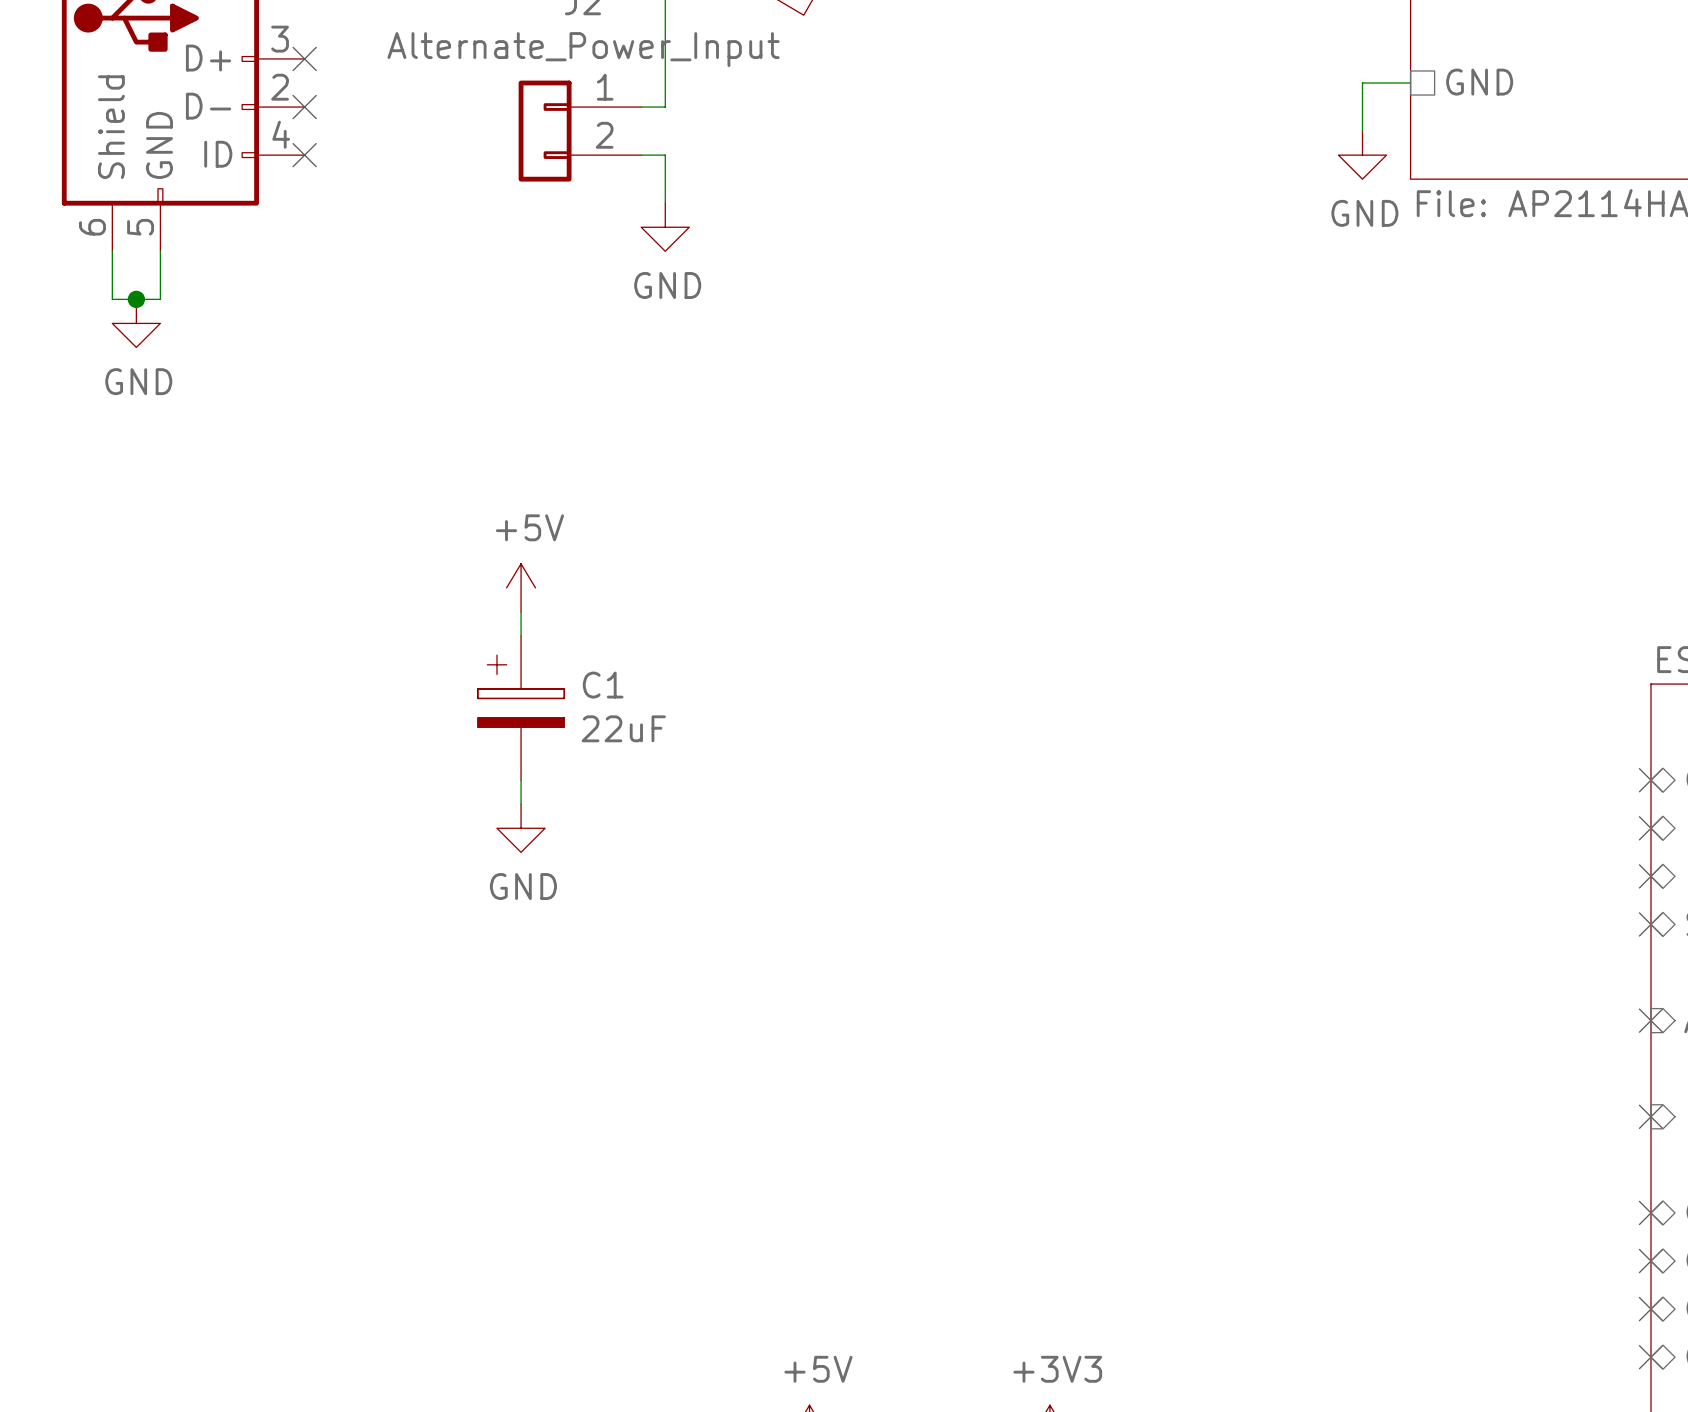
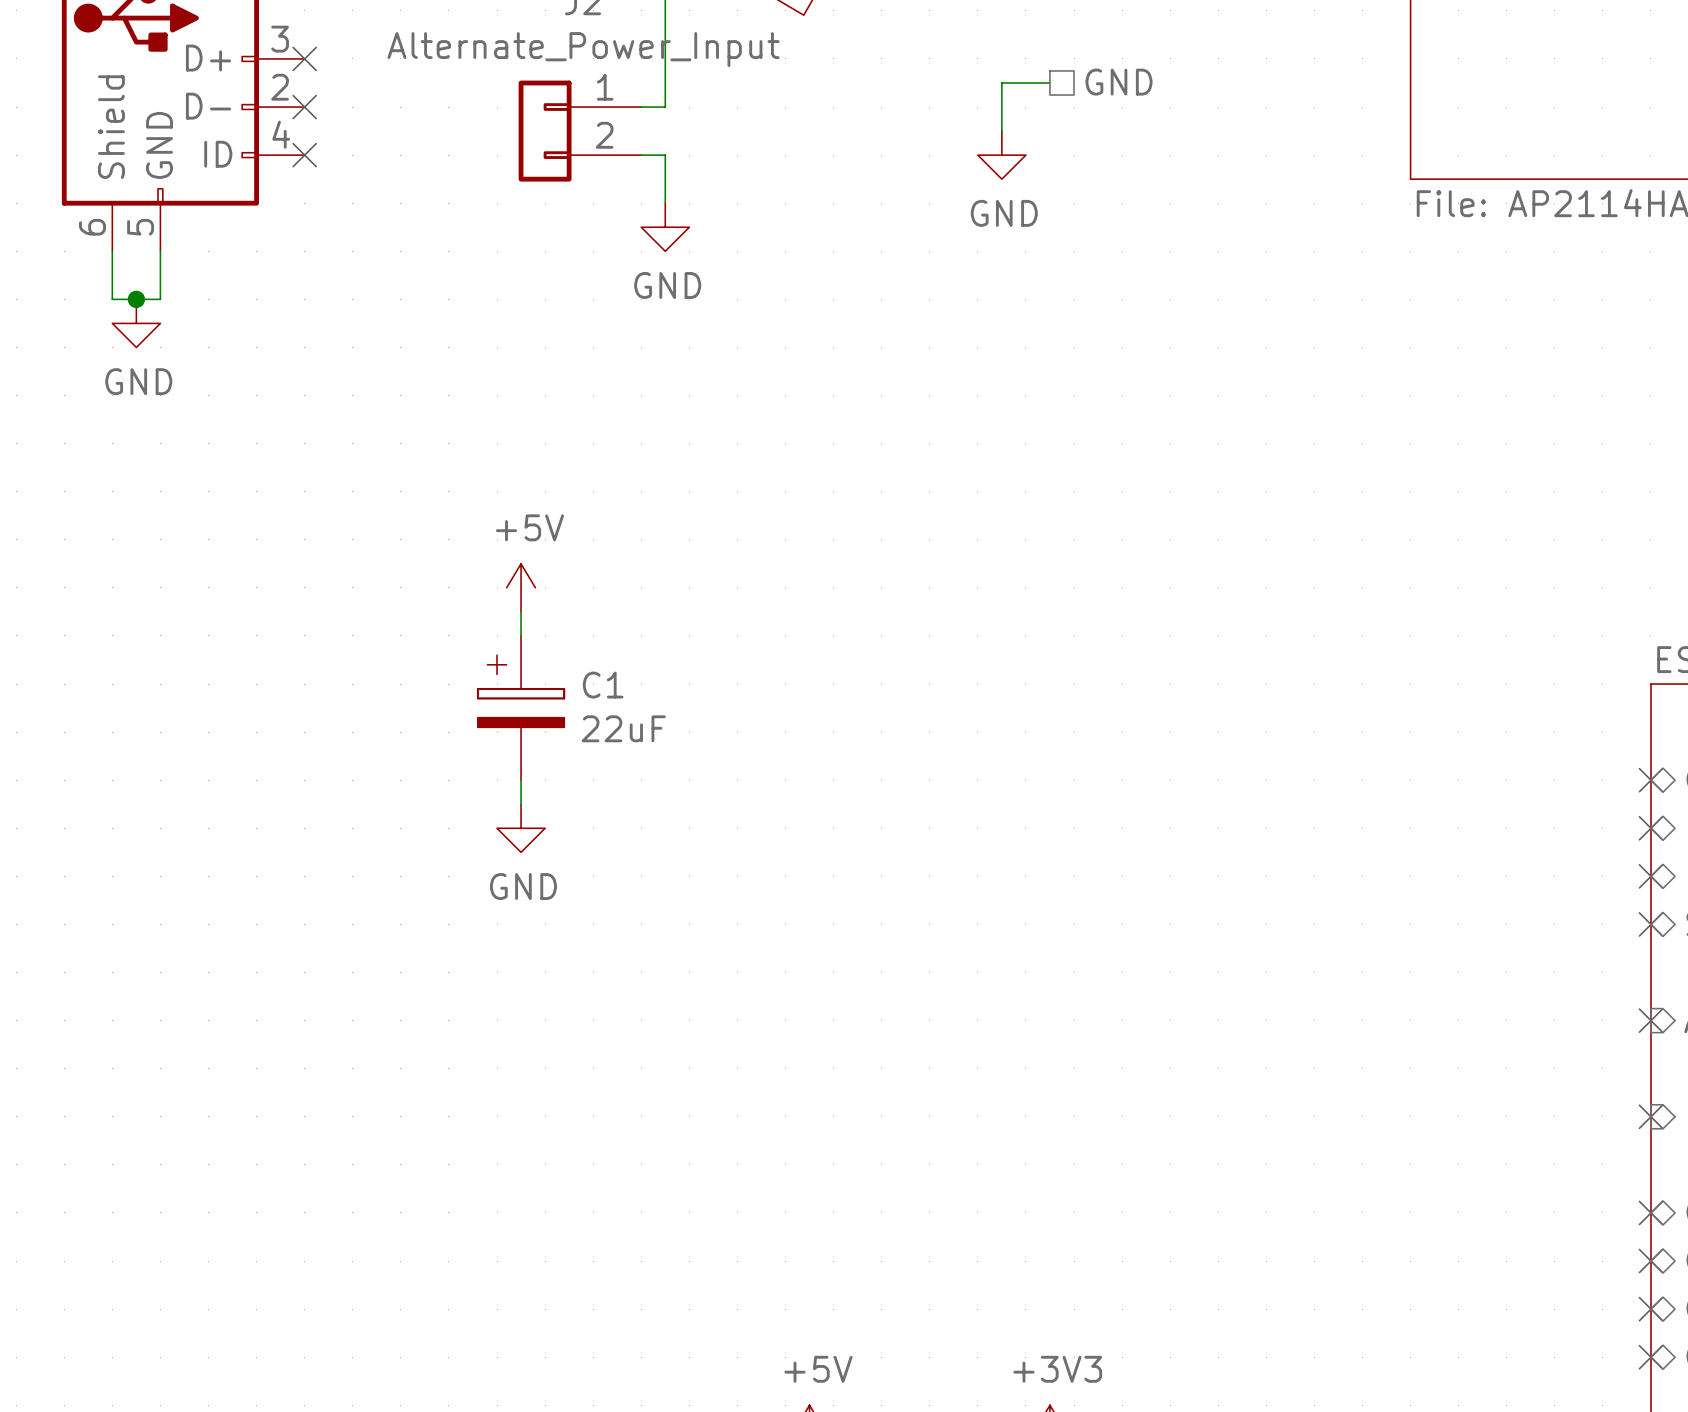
sheet pin position: GND (1479, 82) -> GND (1119, 82)
wire: (1410, 83) (1362, 83) (1362, 131) -> (1049, 83) (1001, 83) (1001, 131)
power symbol position: GND (1362, 155) -> GND (1001, 155)

